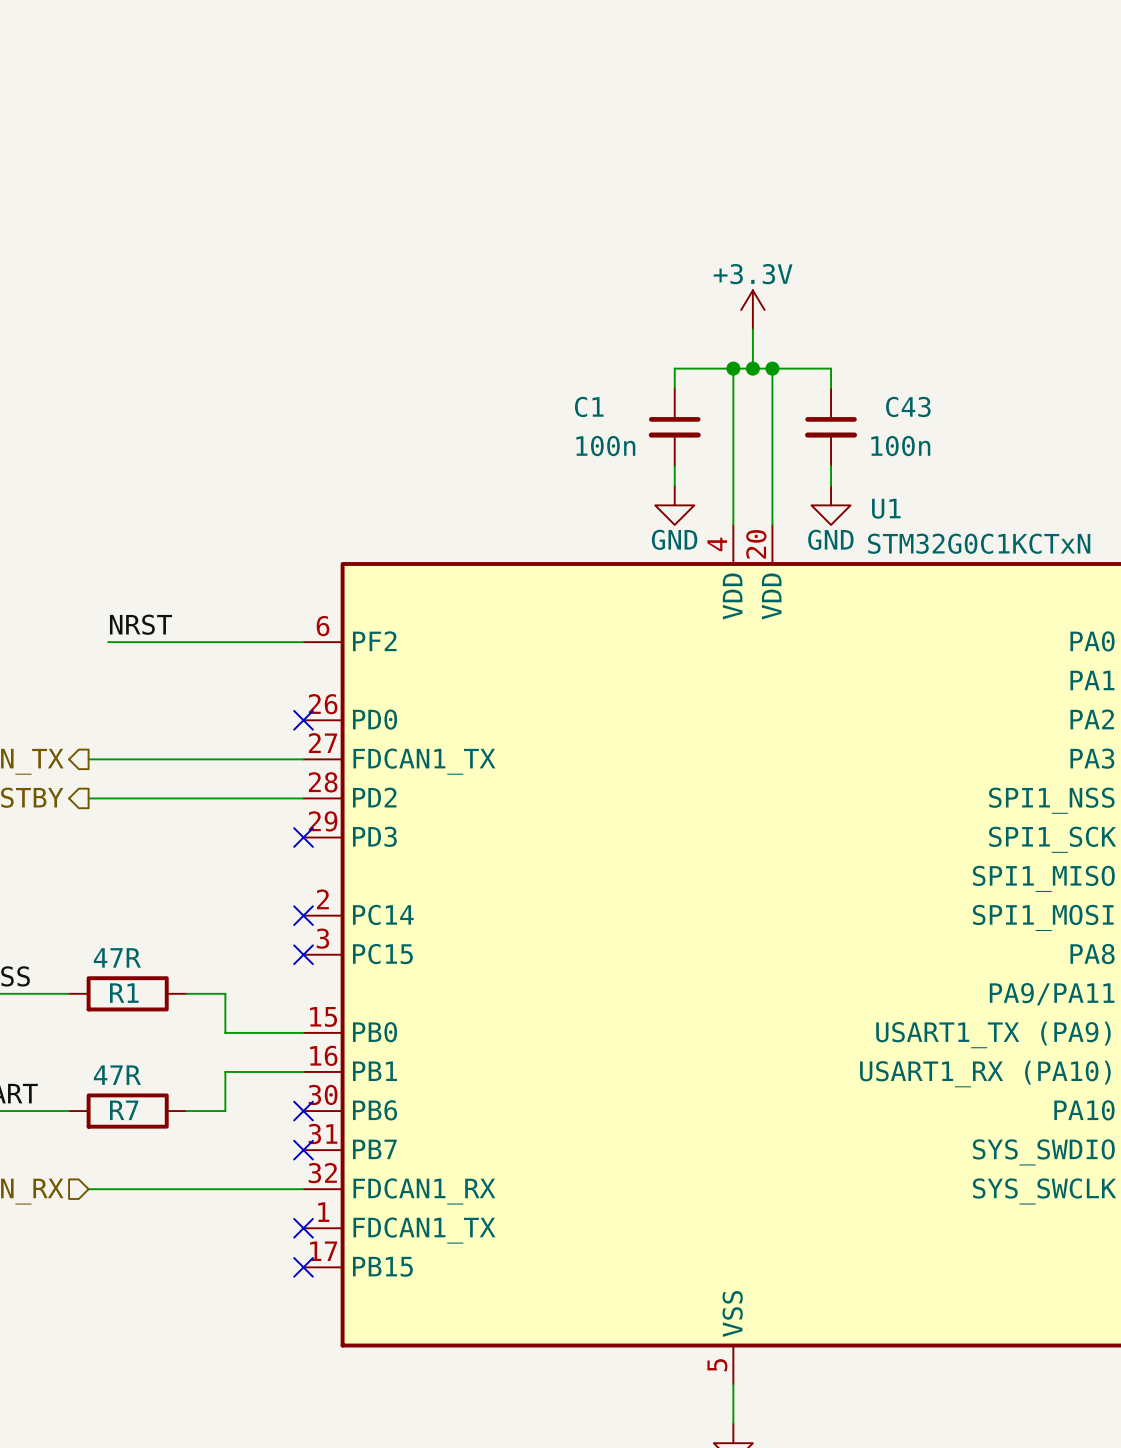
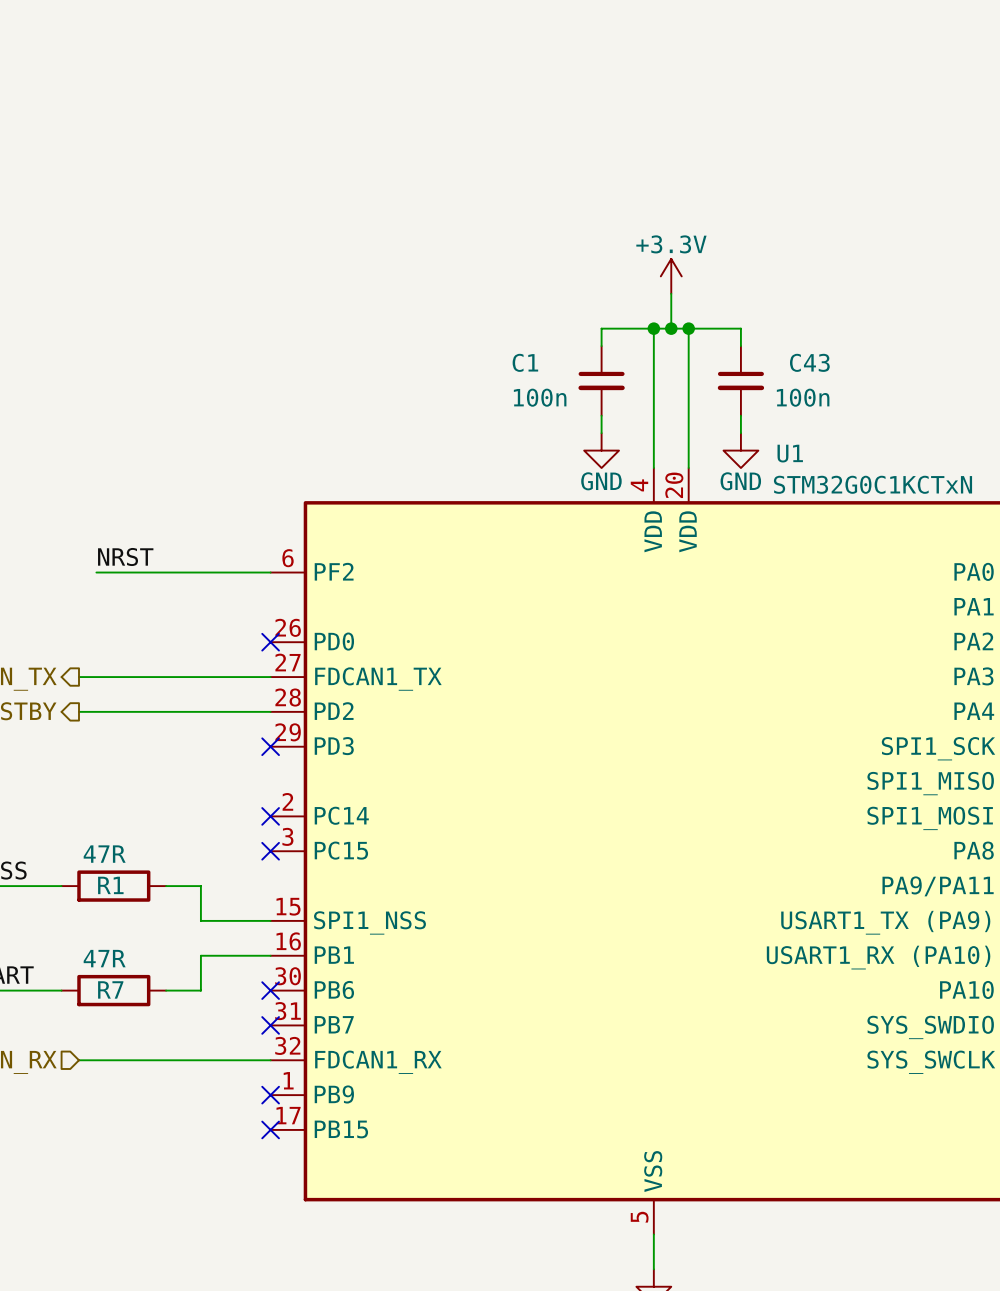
U1 pin name: SPI1_NSS (1051, 800) -> PA4 (974, 711)
U1 pin name: PB0 (375, 1032) -> SPI1_NSS (369, 922)
U1 pin name: FDCAN1_TX (424, 1230) -> PB9 (334, 1094)

